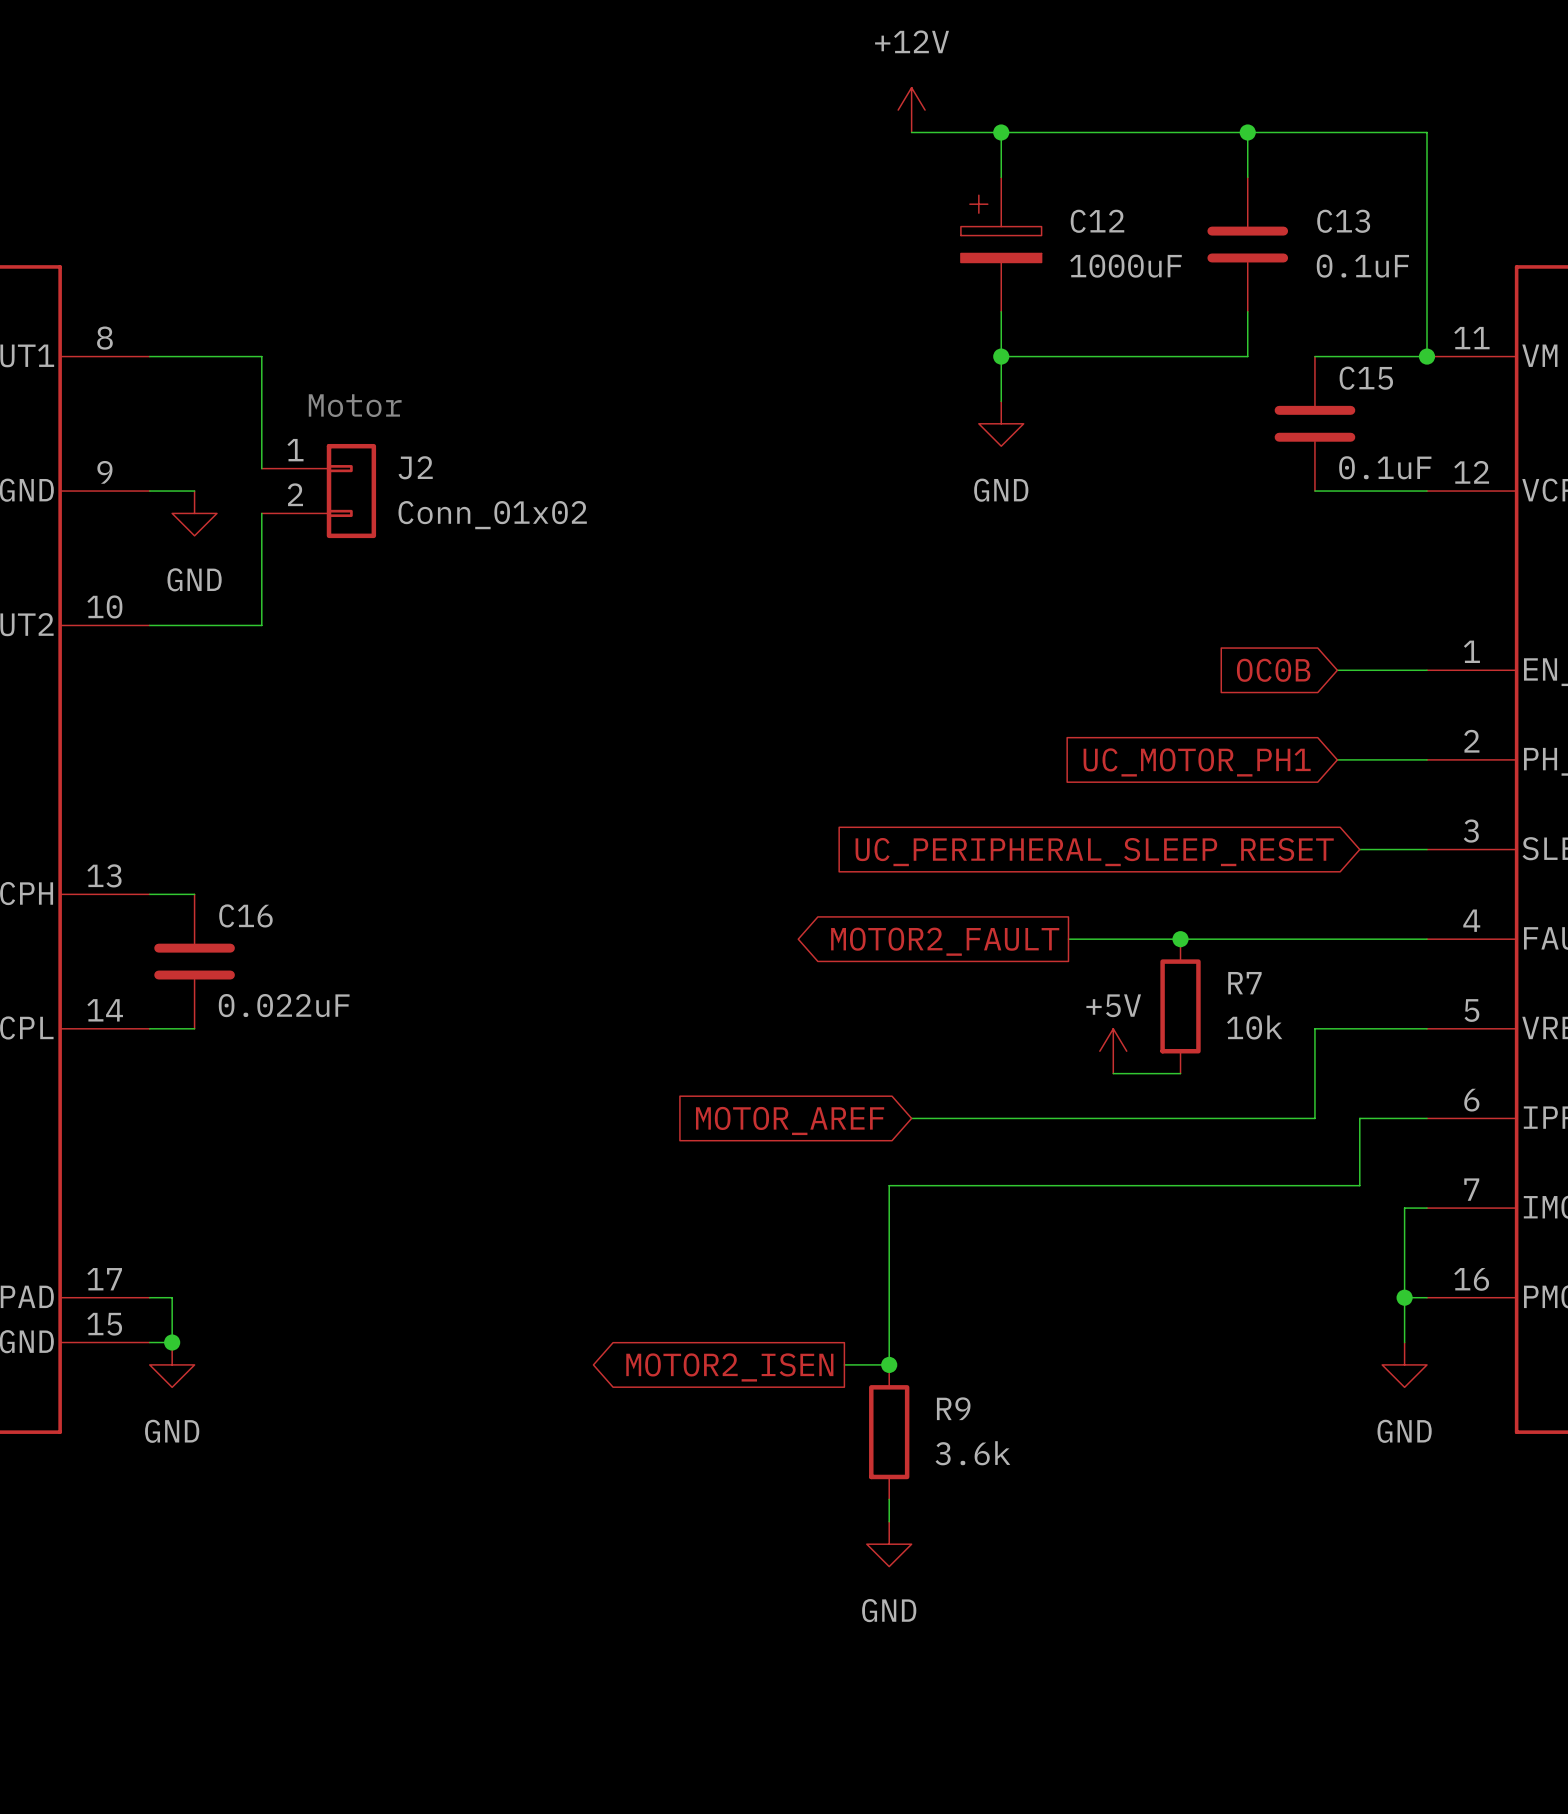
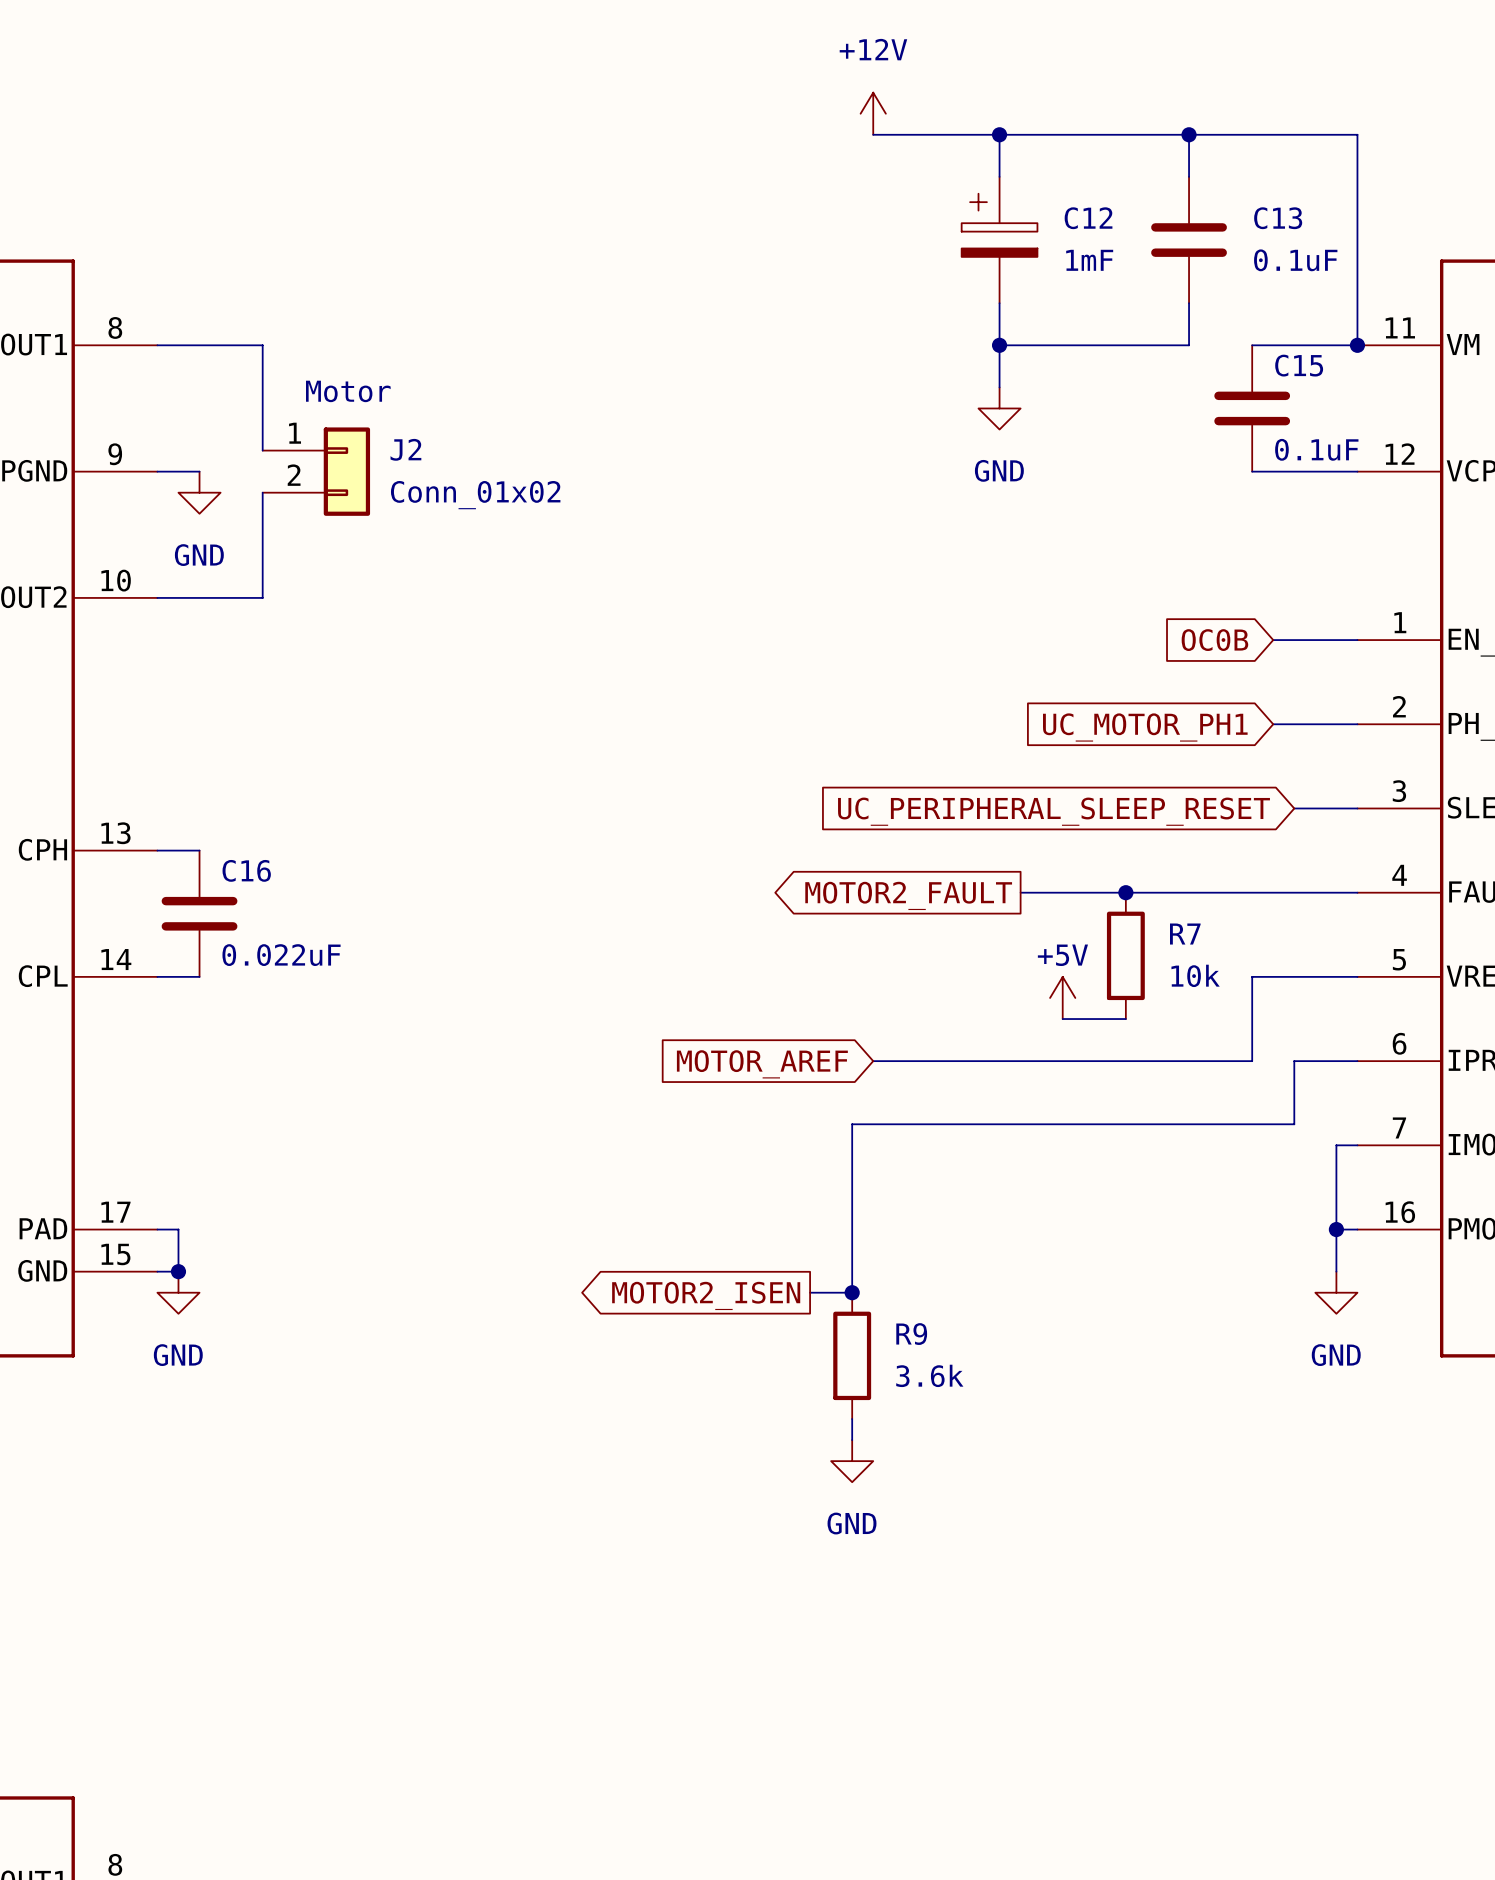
wire: (1001, 132) (1001, 177) -> (999, 134) (999, 176)
junction position: (1001, 132) -> (999, 134)
C12 position: (1001, 244) -> (999, 240)
C12 value: 1000uF (1125, 266) -> 1mF (1089, 260)
wire: (1001, 311) (1001, 401) -> (999, 303) (999, 387)
wire: (1001, 356) (1046, 356) -> none
junction position: (1001, 356) -> (999, 345)
power symbol position: GND (1001, 423) -> GND (999, 408)

